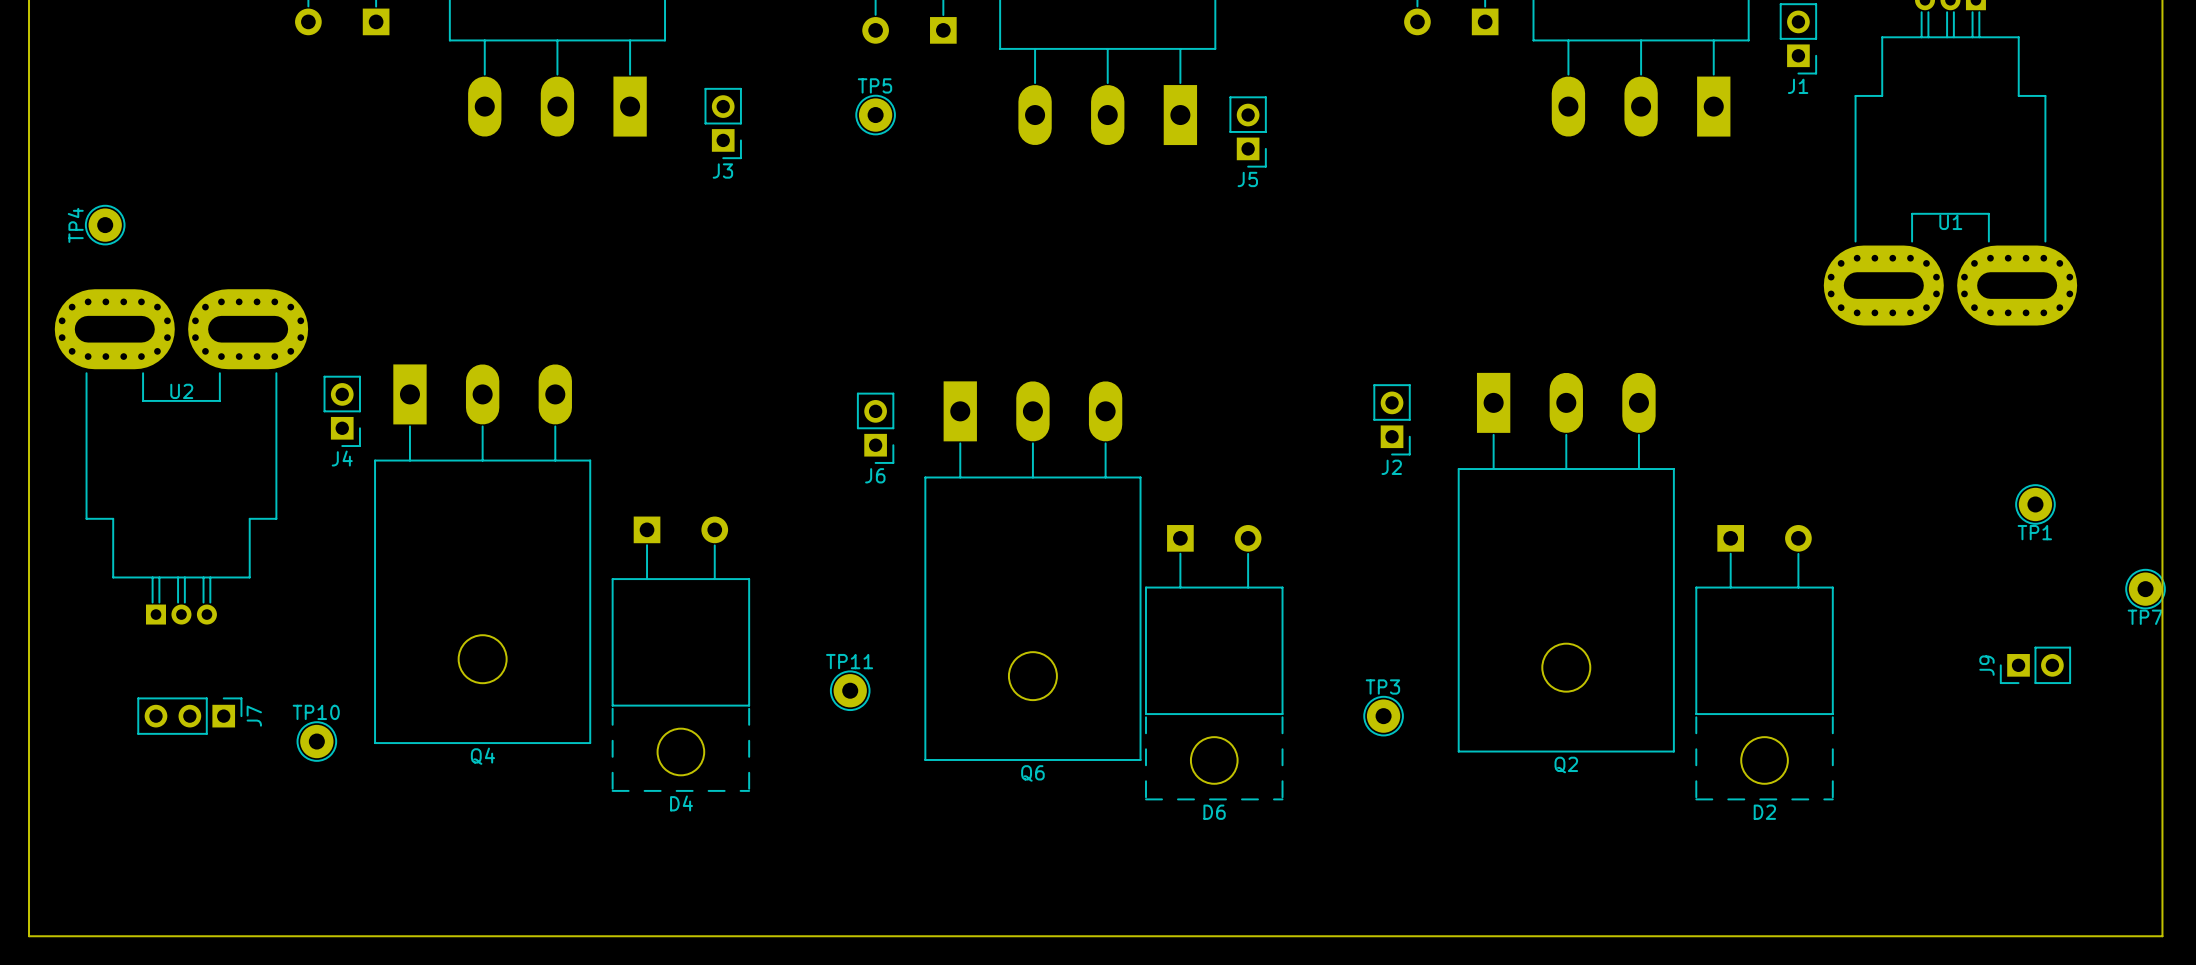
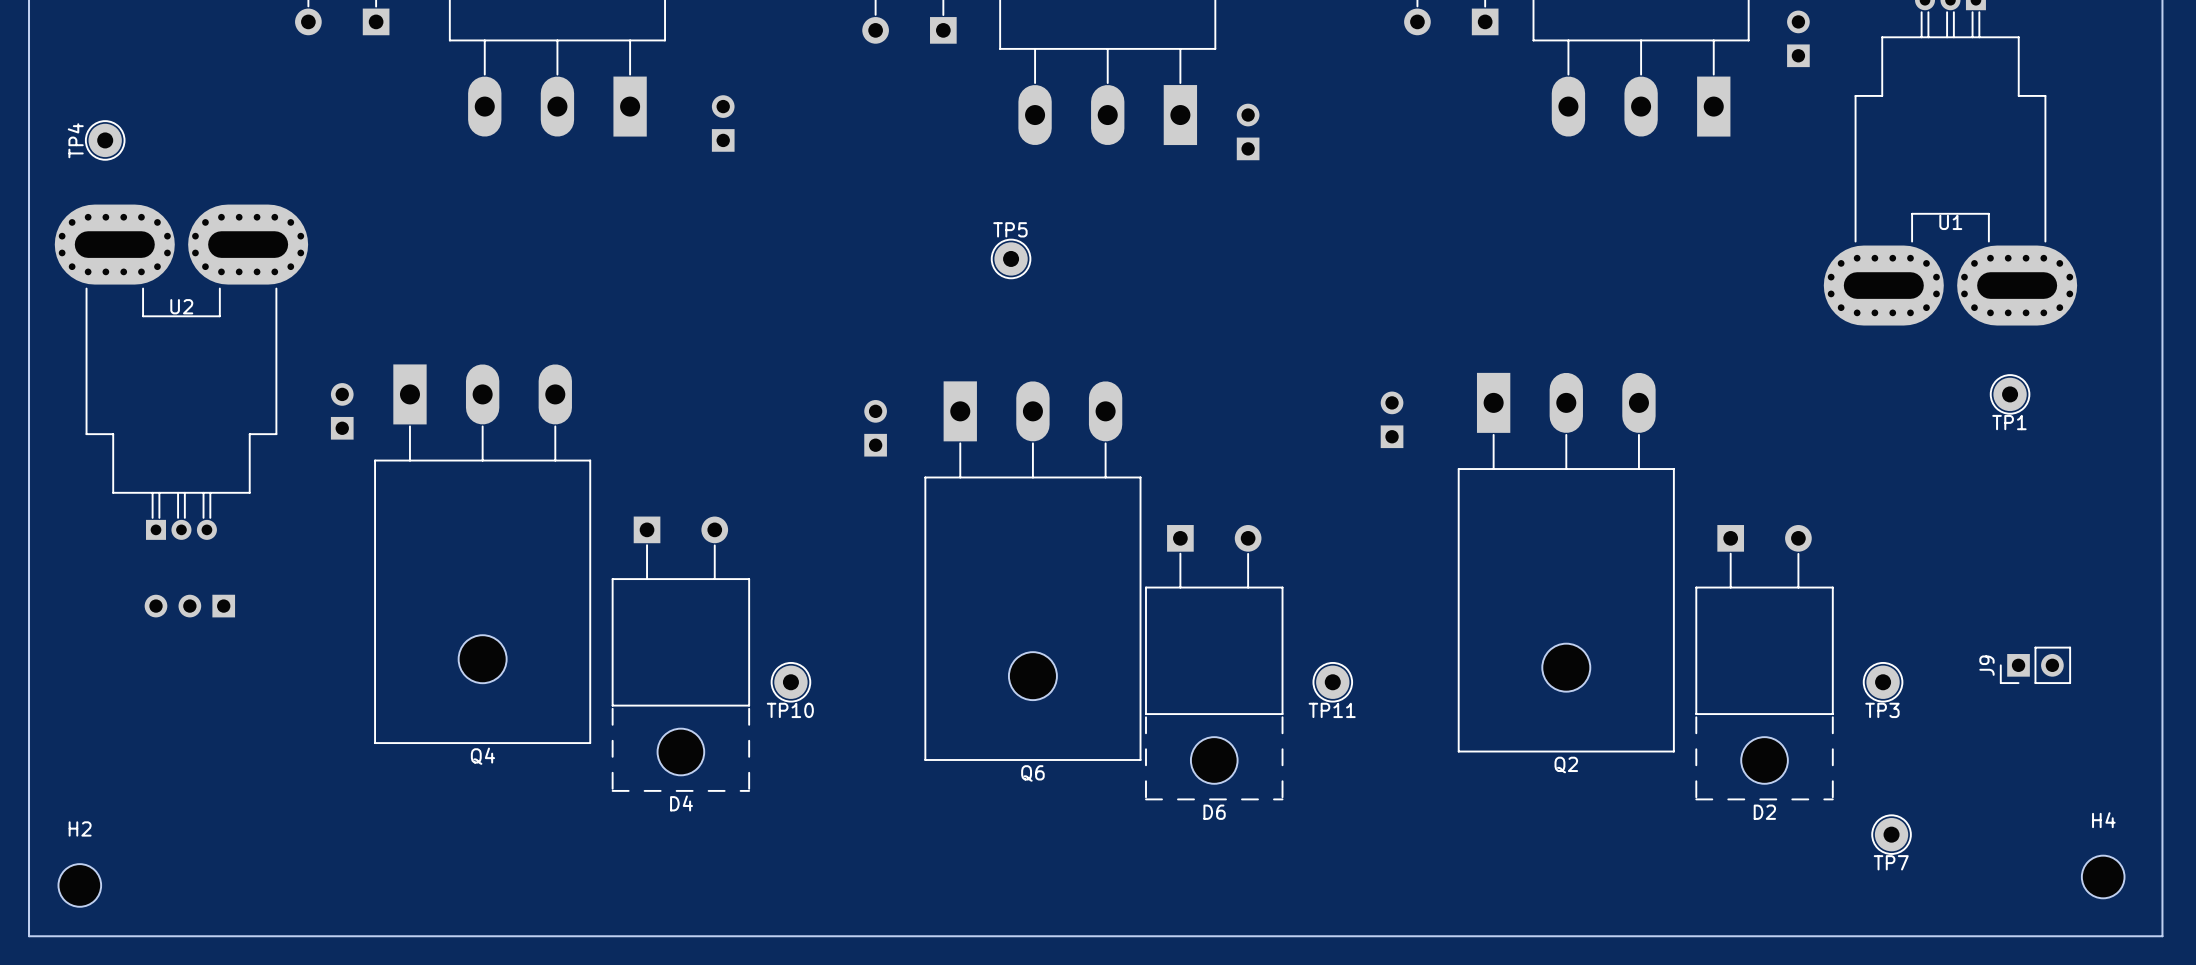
J1 side: top (1798, 38) -> bottom (1798, 38)
TP5 position: (875, 115) -> (1011, 258)
J3 side: top (723, 123) -> bottom (723, 123)
J5 side: top (1248, 131) -> bottom (1248, 131)
TP4 position: (105, 225) -> (105, 140)
J4 side: top (342, 411) -> bottom (342, 411)
J2 side: top (1392, 419) -> bottom (1392, 419)
J6 side: top (875, 428) -> bottom (875, 428)
U2 position: (181, 456) -> (181, 372)
TP1 position: (2035, 504) -> (2010, 394)
TP7 position: (2145, 589) -> (1891, 834)
TP11 name position: TP11 (849, 661) -> TP11 (1332, 710)
TP3 name position: TP3 (1382, 686) -> TP3 (1882, 710)
TP11 position: (850, 690) -> (1332, 682)
TP10 name position: TP10 (316, 712) -> TP10 (790, 710)
J7 side: top (189, 716) -> bottom (189, 606)
TP3 position: (1383, 716) -> (1883, 682)
TP10 position: (316, 741) -> (790, 682)
H4: none -> (2103, 876)
H2: none -> (79, 885)

